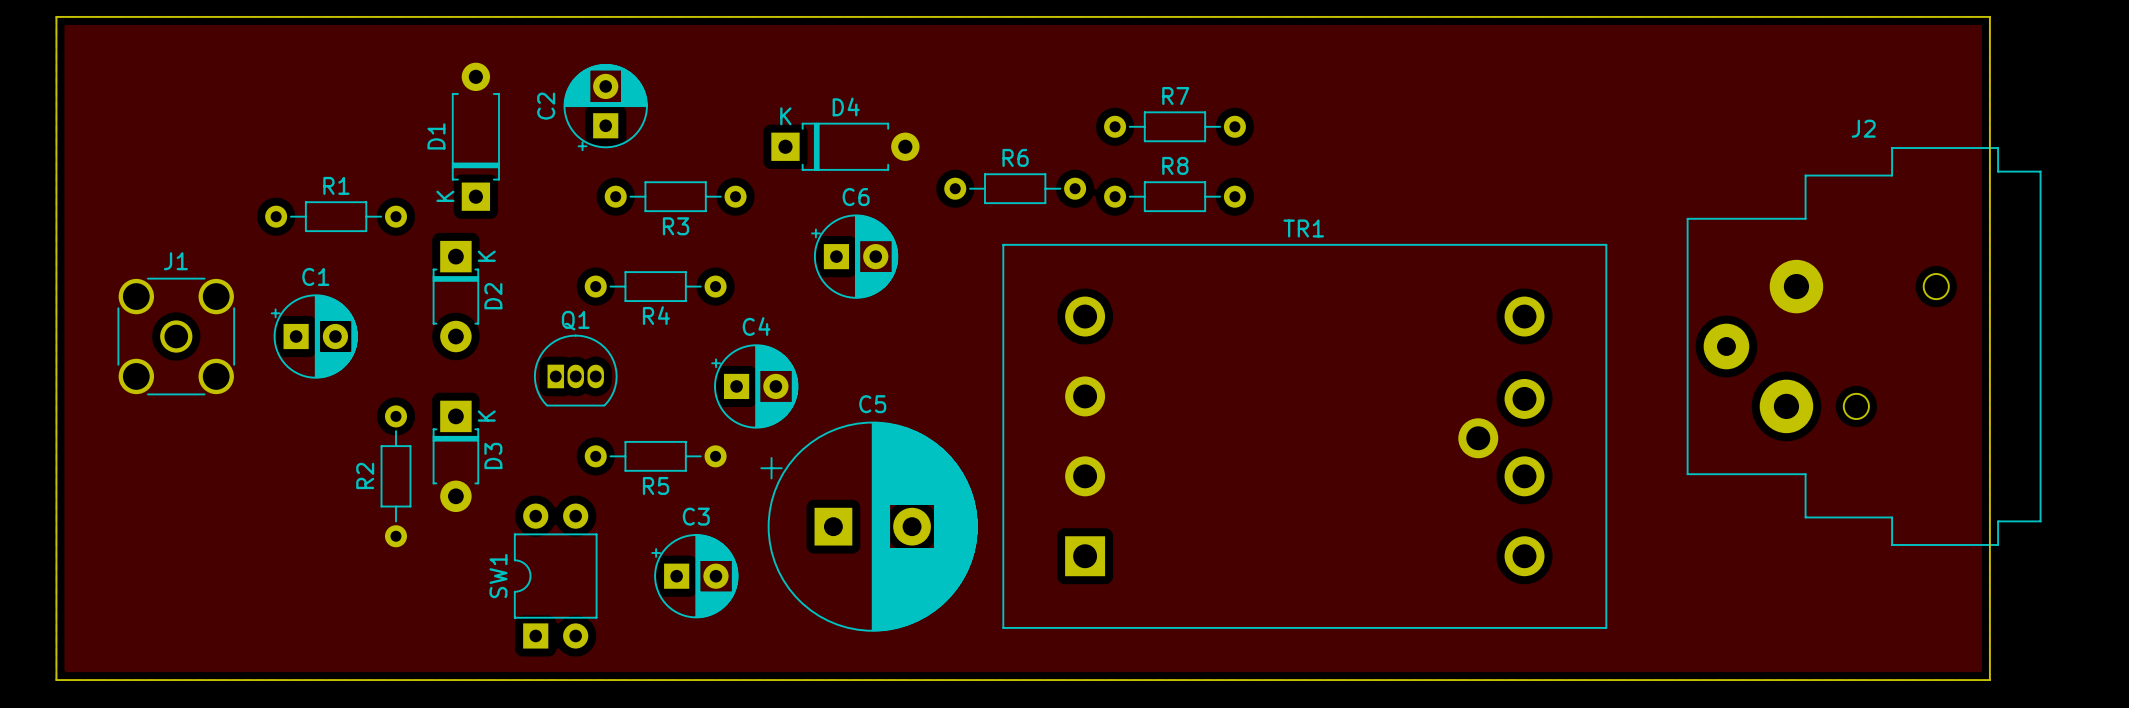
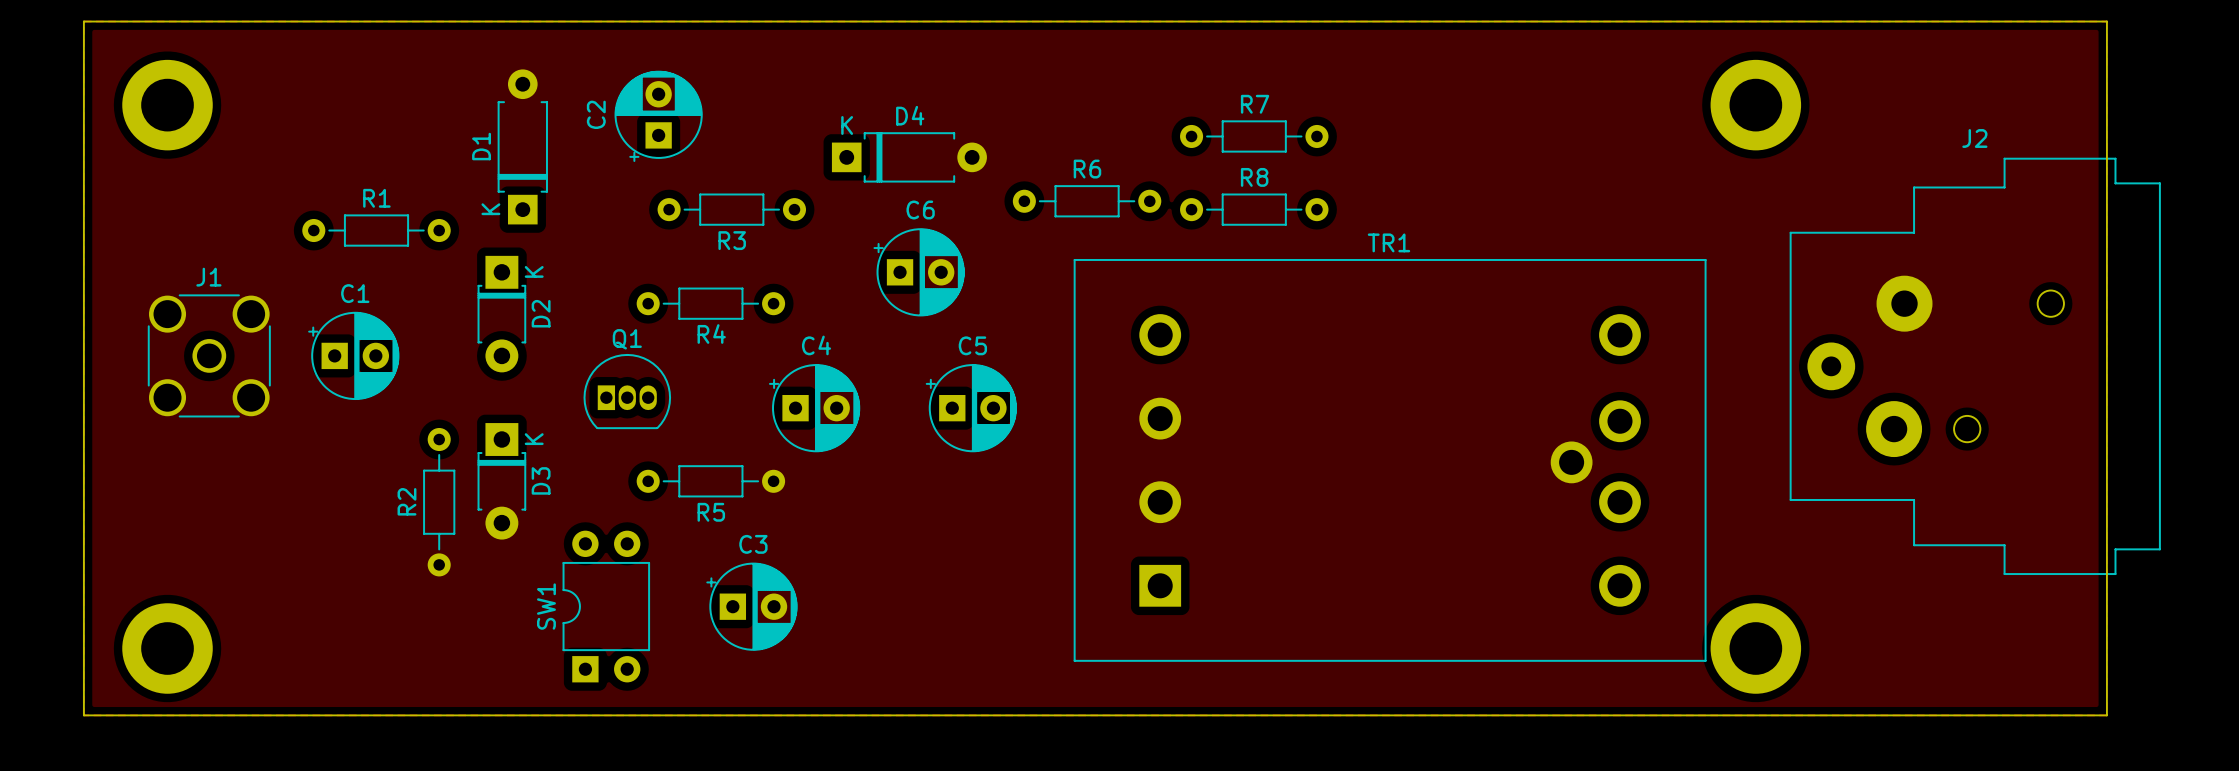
part: none -> (167, 105)
part: none -> (1755, 105)
C5 name position: C5 (872, 404) -> C5 (972, 345)
C5 footprint: [760, 421, 978, 632] -> [925, 364, 1017, 453]
part: none -> (167, 648)
part: none -> (1755, 648)

